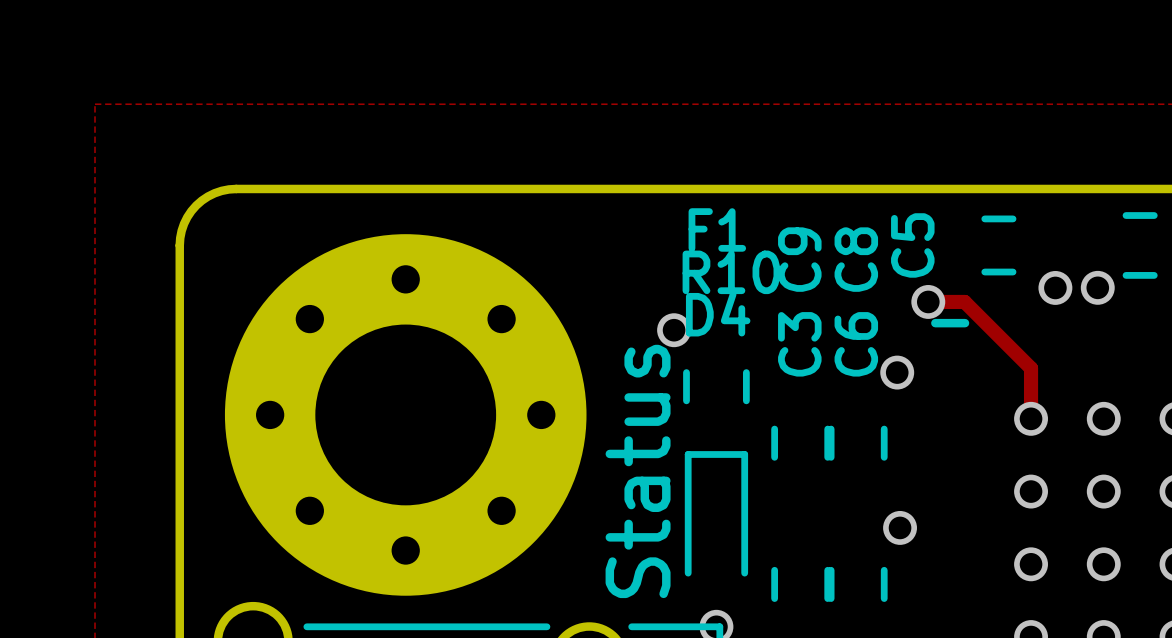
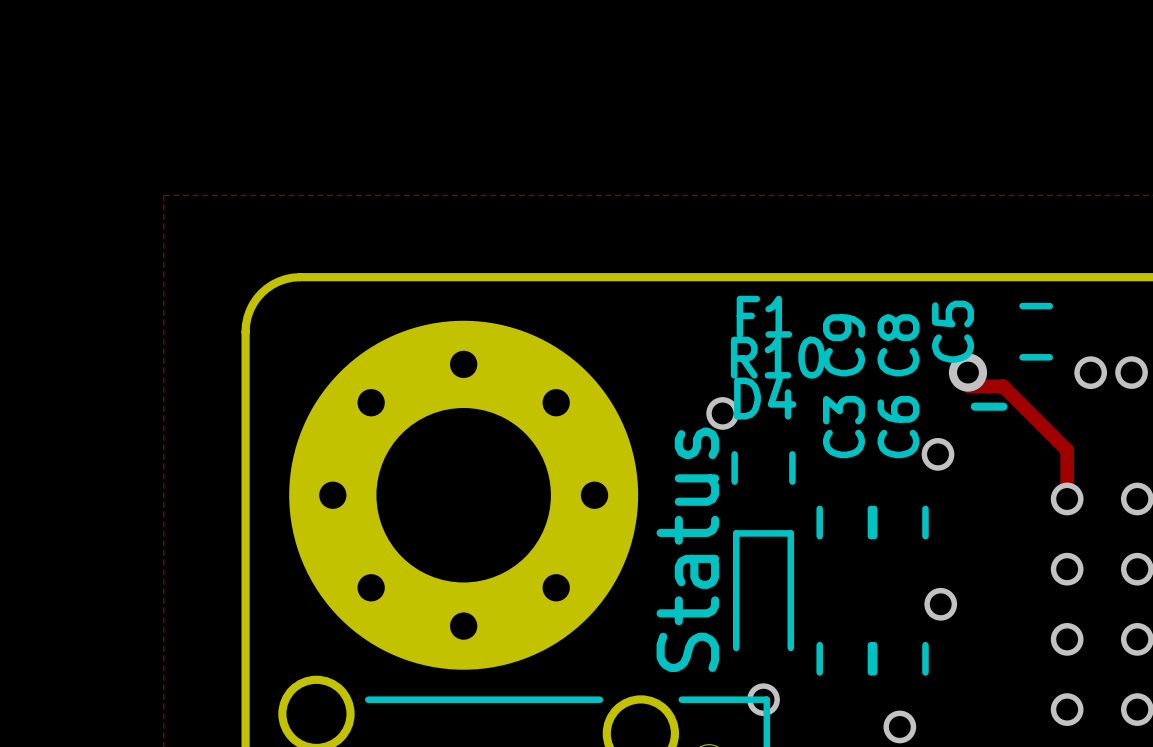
via position: (928, 301) -> (967, 372)

